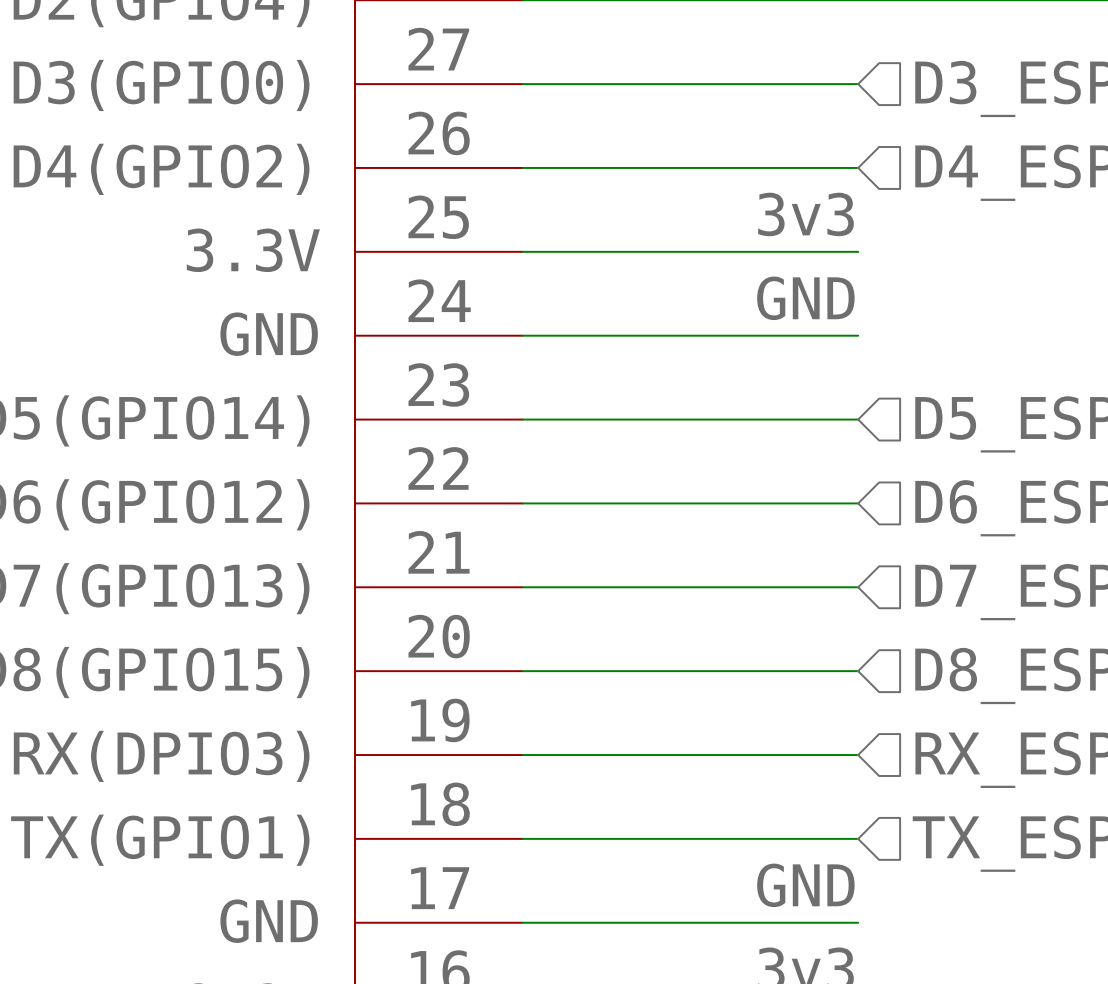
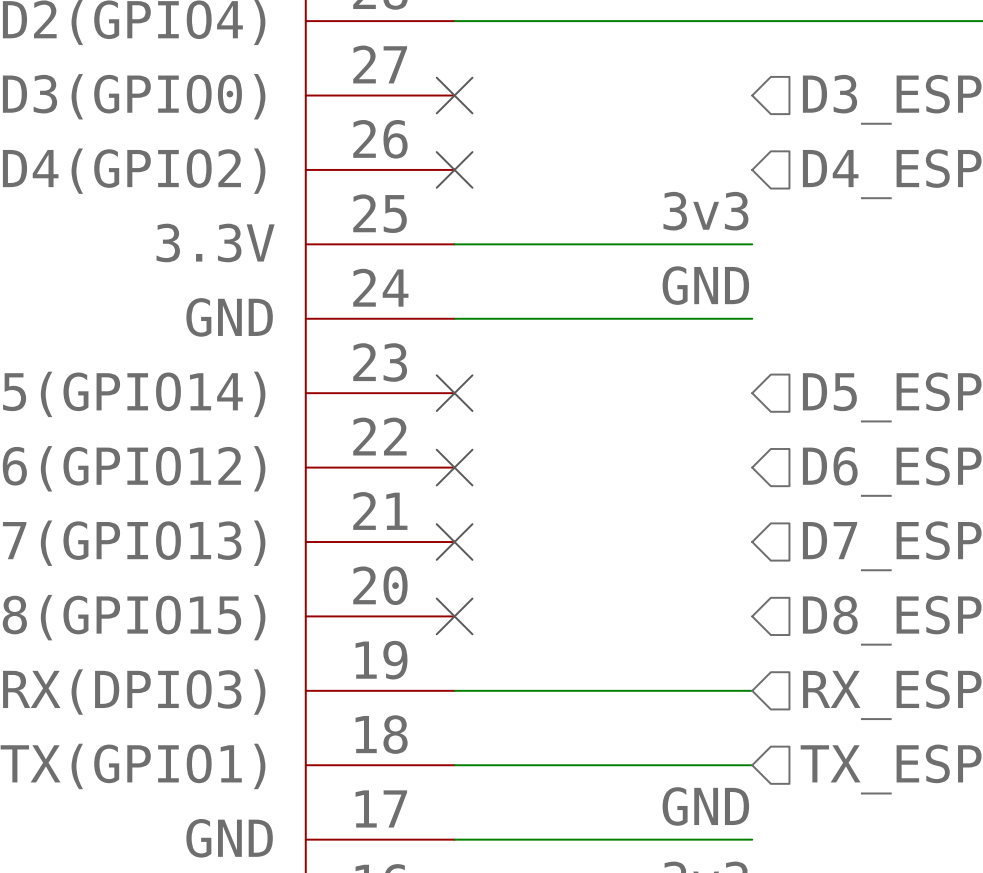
wire: (522, 84) (858, 84) -> none
no-connect mark: none -> (454, 95)
wire: (522, 167) (858, 167) -> none
no-connect mark: none -> (454, 169)
wire: (522, 419) (858, 419) -> none
no-connect mark: none -> (454, 393)
wire: (522, 503) (858, 503) -> none
no-connect mark: none -> (454, 467)
wire: (522, 587) (858, 587) -> none
no-connect mark: none -> (454, 542)
wire: (522, 671) (858, 671) -> none
no-connect mark: none -> (454, 616)

